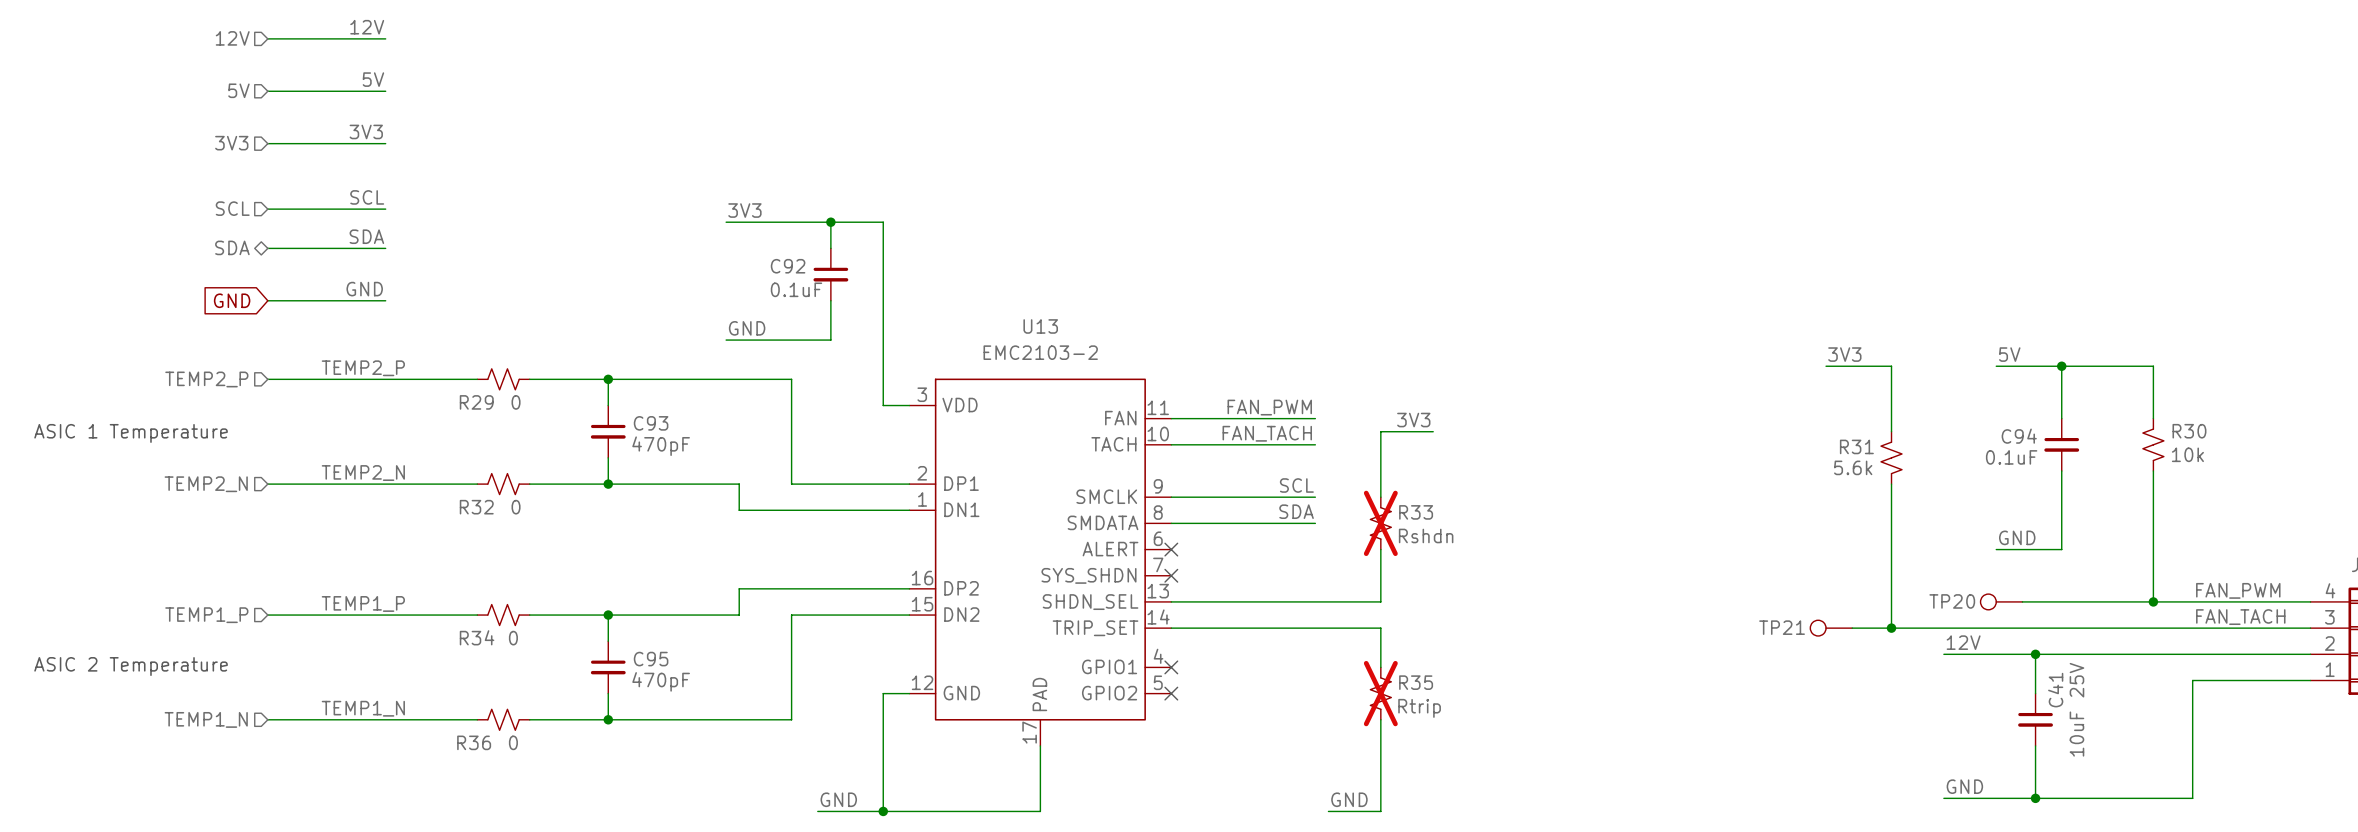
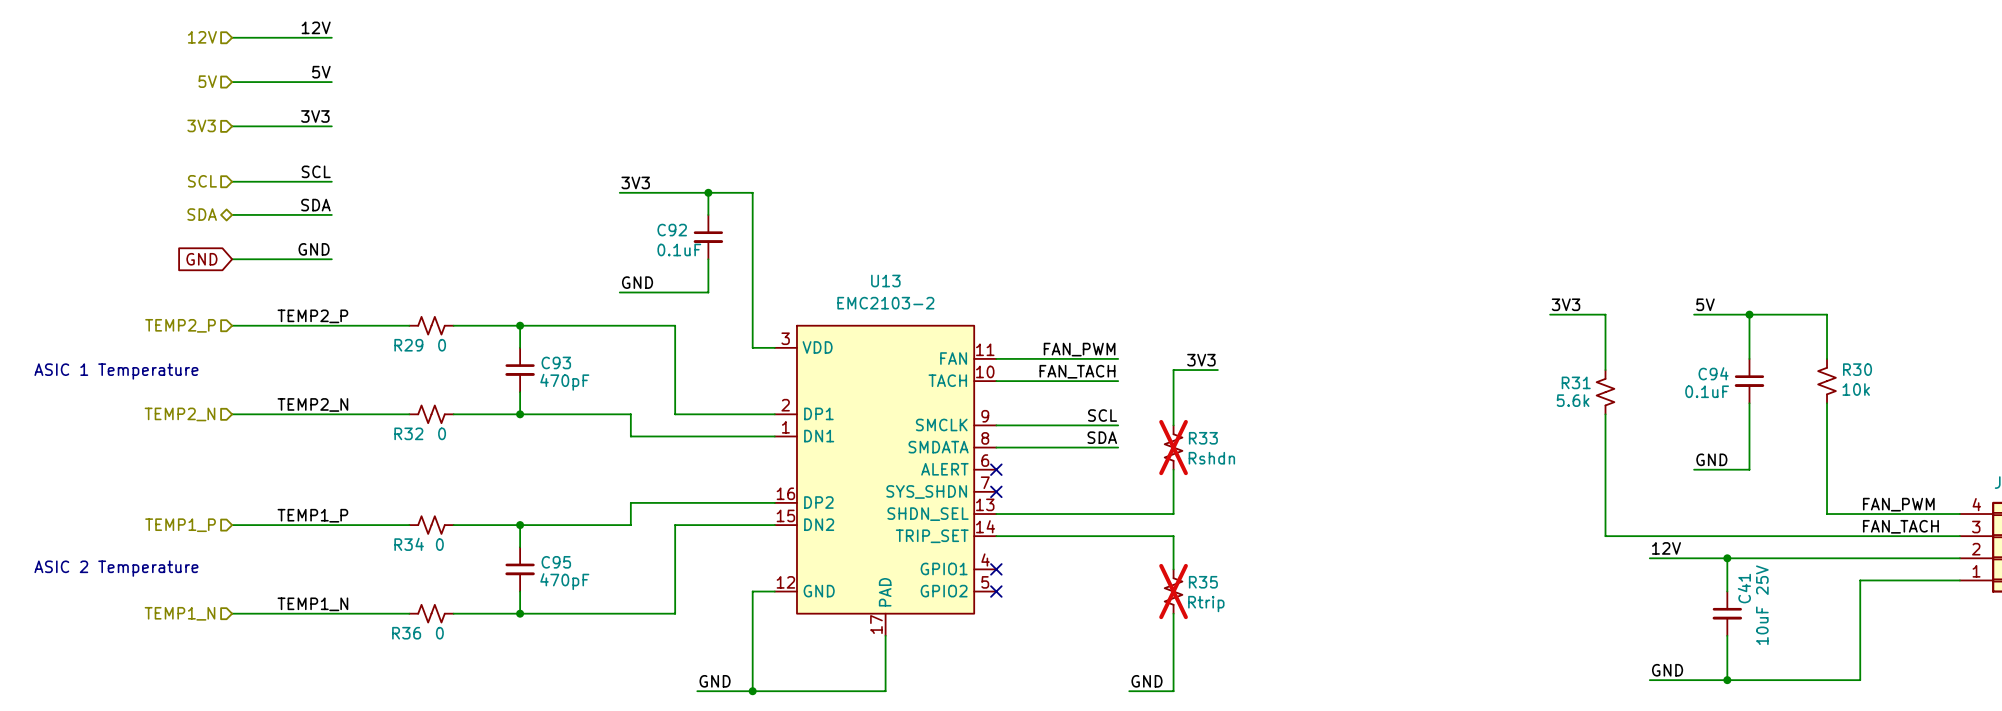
TP20: (2001, 601) -> none
wire: (2022, 601) (2153, 601) -> none
junction: (2153, 601) -> none
TP21: (1831, 628) -> none
wire: (1852, 628) (1891, 628) -> none
junction: (1891, 628) -> none

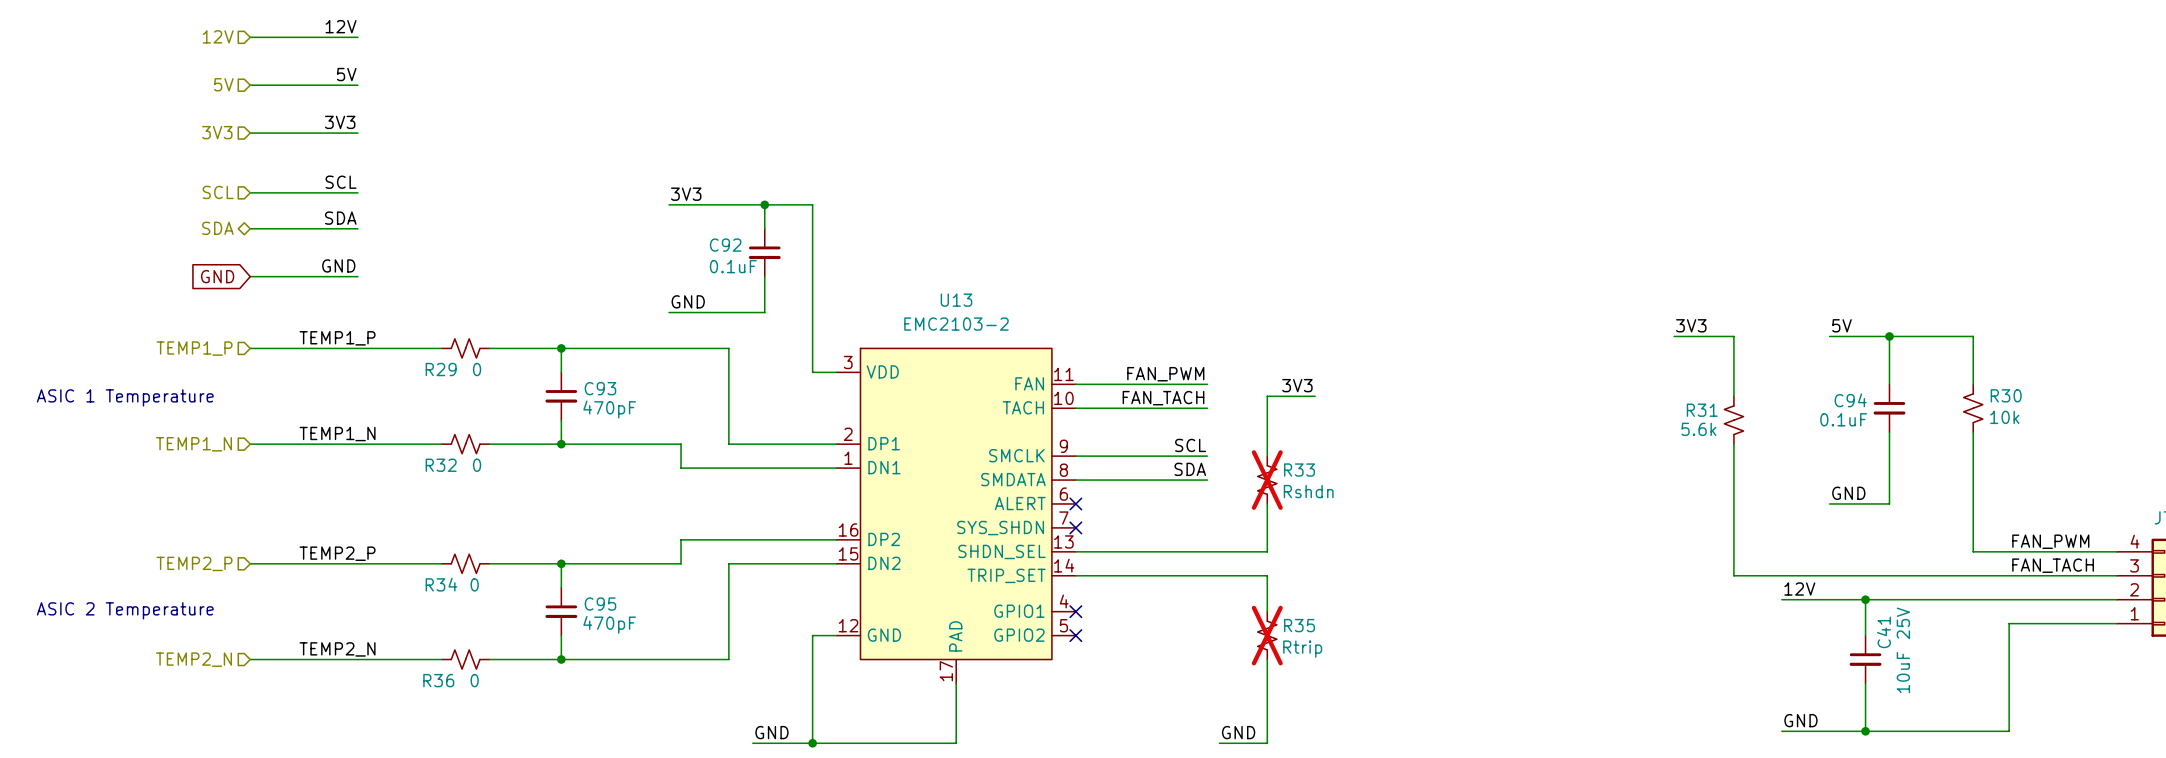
label: TEMP2_P (312, 316) -> TEMP1_P (337, 338)
hierarchical label: TEMP2_P (180, 325) -> TEMP1_P (194, 348)
label: TEMP2_N (312, 404) -> TEMP1_N (337, 434)
hierarchical label: TEMP2_N (180, 414) -> TEMP1_N (193, 444)
label: TEMP1_P (312, 515) -> TEMP2_P (337, 553)
hierarchical label: TEMP1_P (180, 525) -> TEMP2_P (194, 563)
label: TEMP1_N (312, 604) -> TEMP2_N (337, 649)
hierarchical label: TEMP1_N (180, 613) -> TEMP2_N (193, 659)

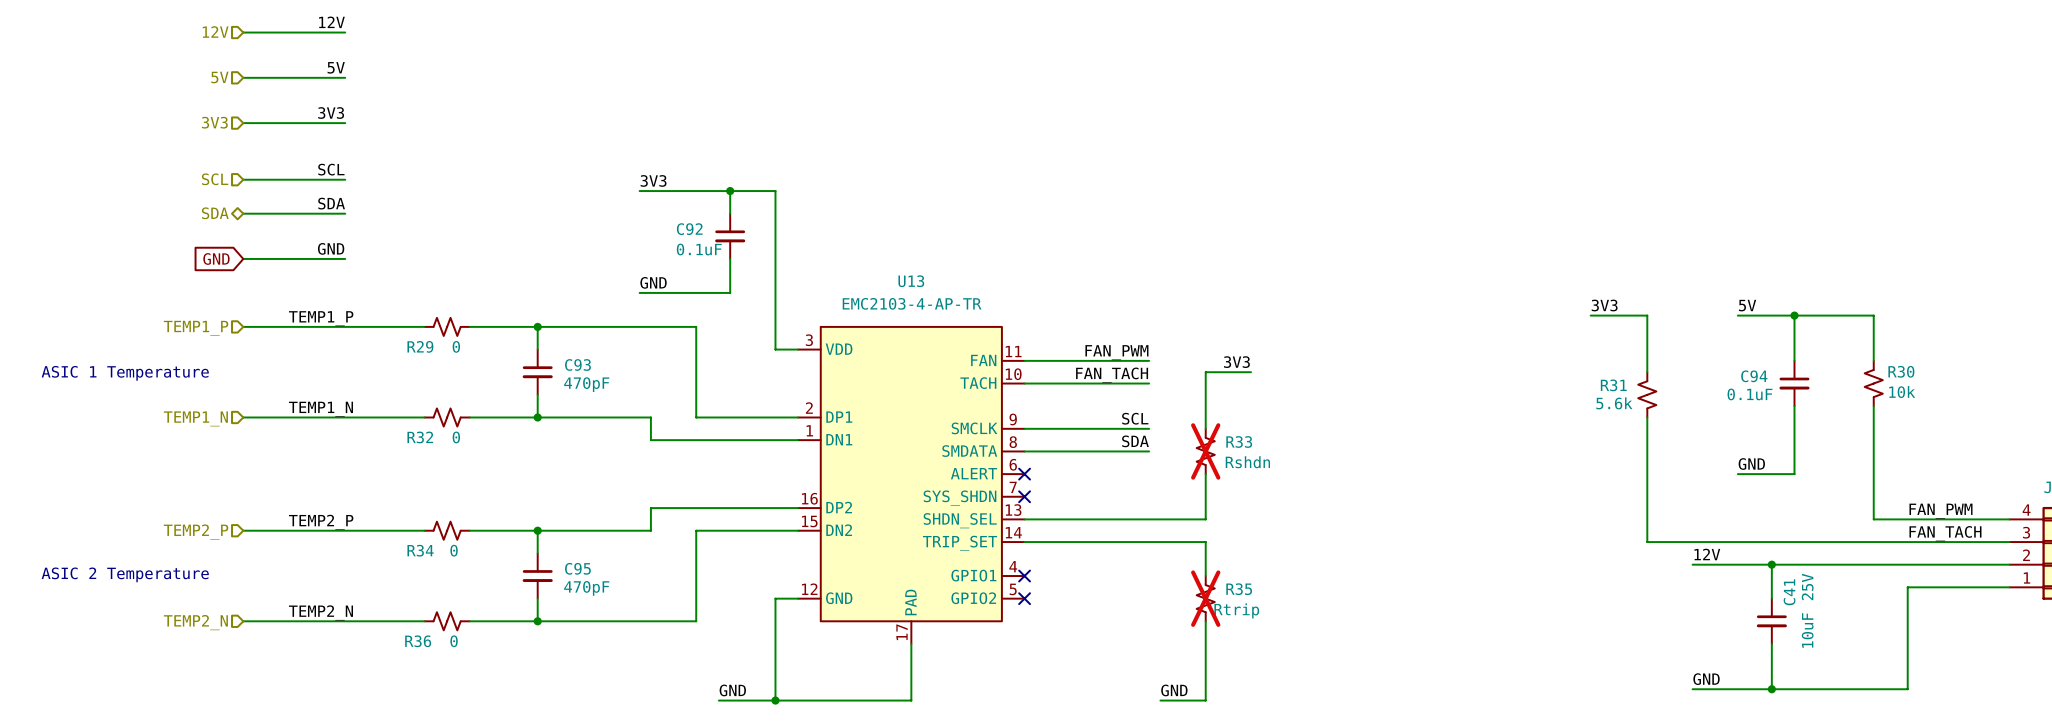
U13 value: EMC2103-2 (956, 324) -> EMC2103-4-AP-TR (912, 303)

